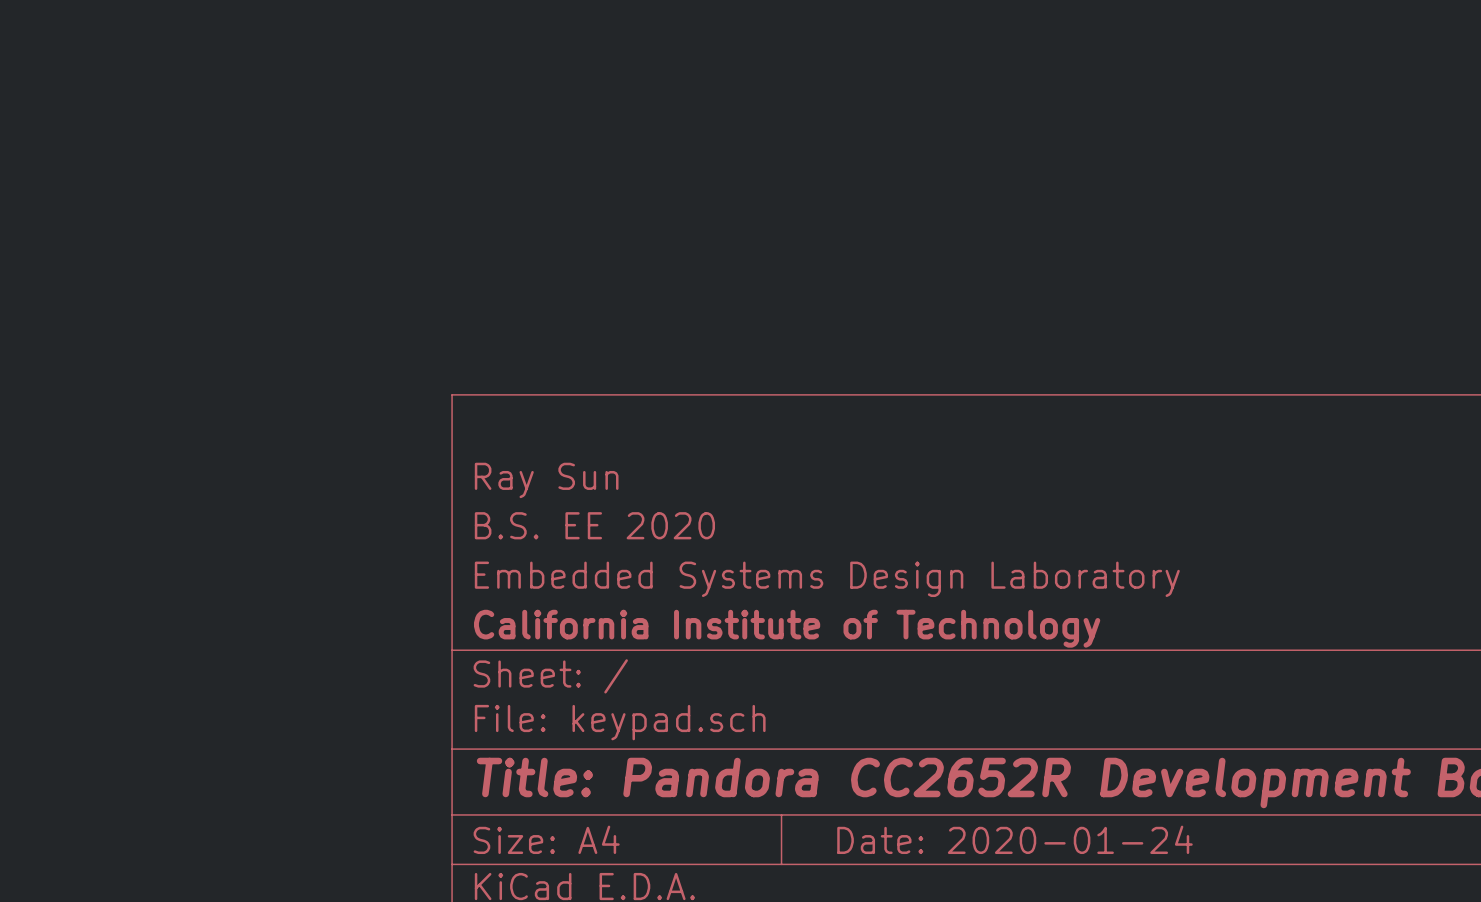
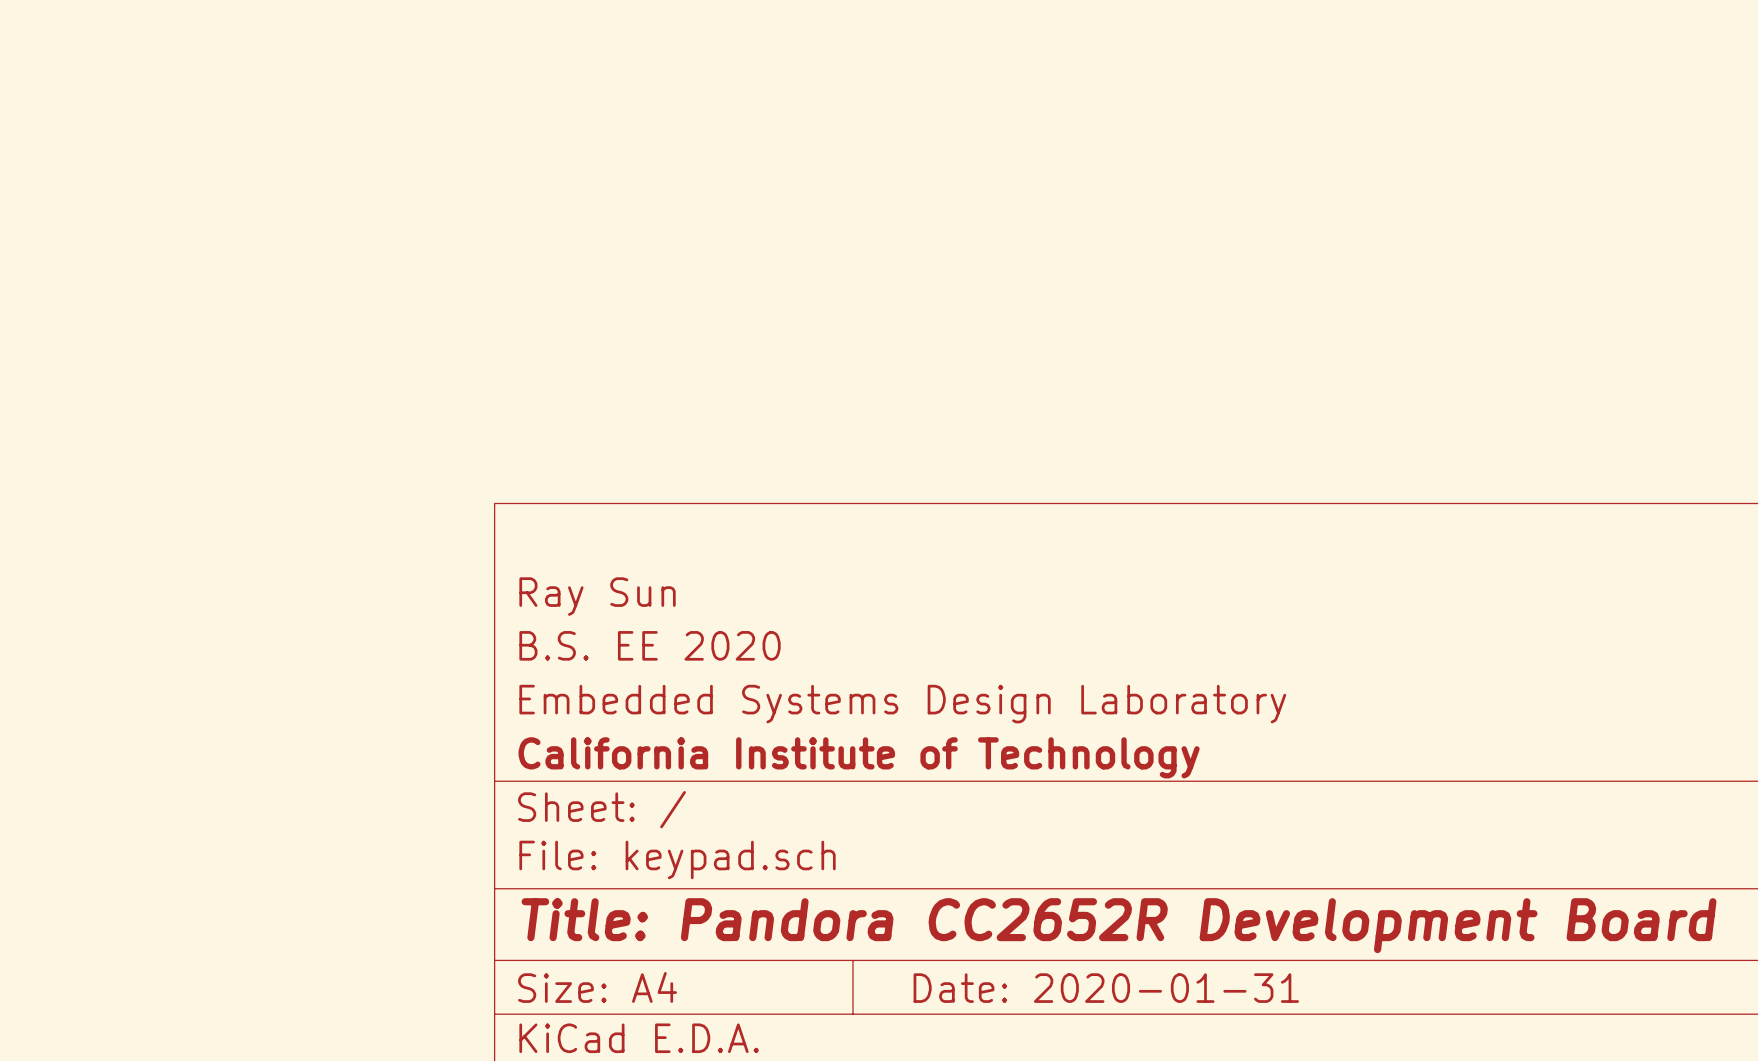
title block: Date: 2020-01-24 (1014, 839) -> Date: 2020-01-31 (1106, 988)

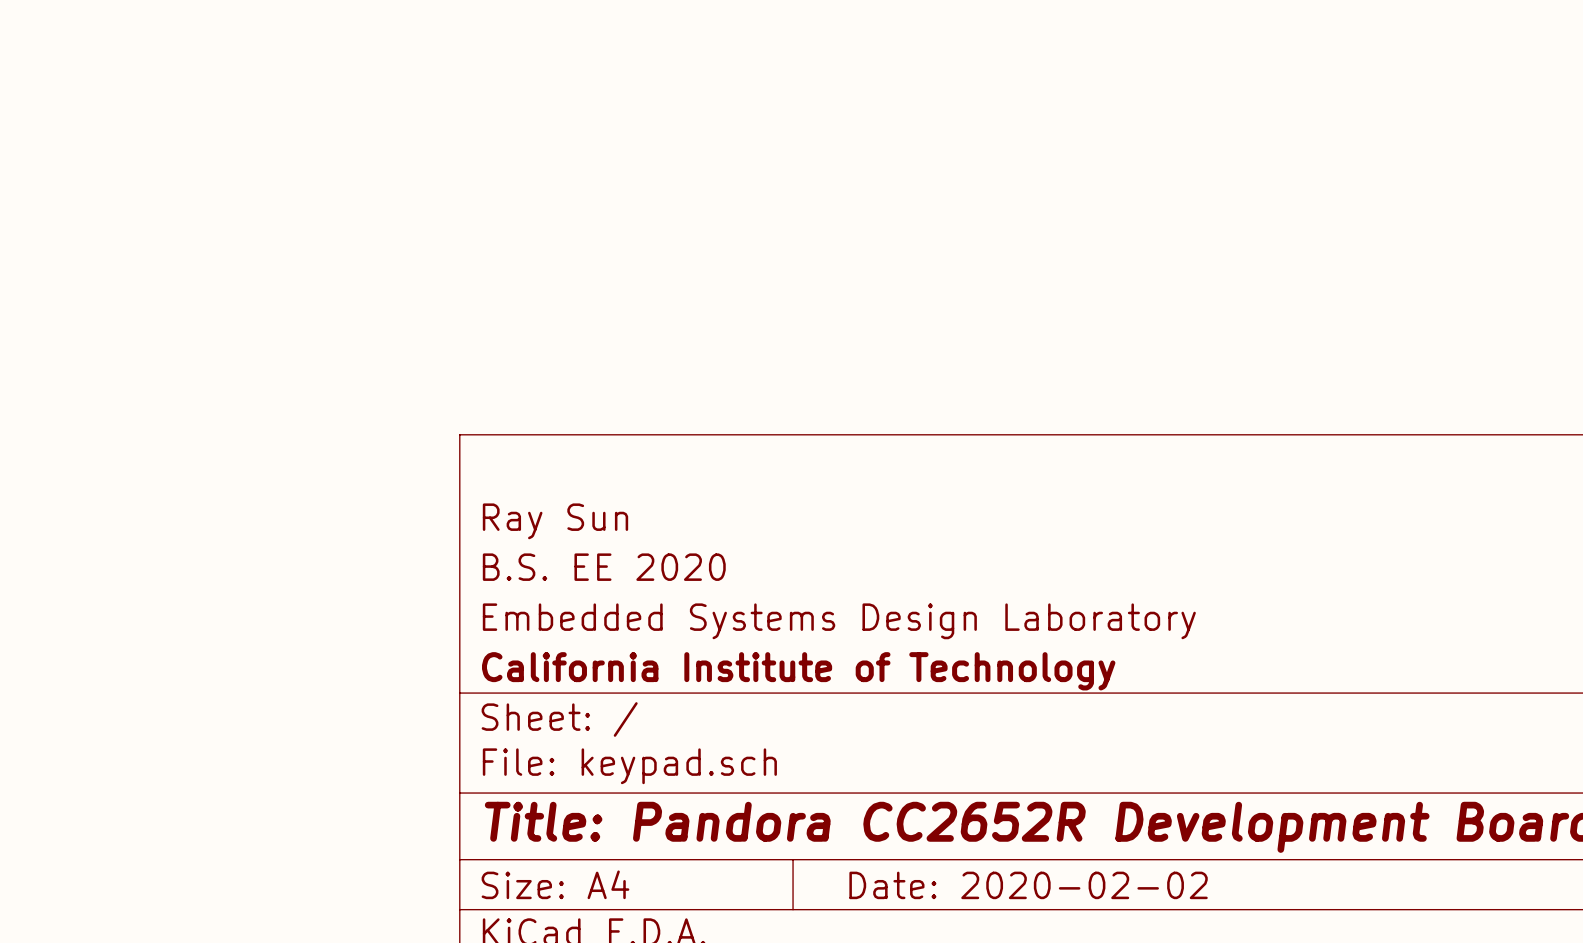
title block: Date: 2020-01-31 (1106, 988) -> Date: 2020-02-02 (1028, 885)

